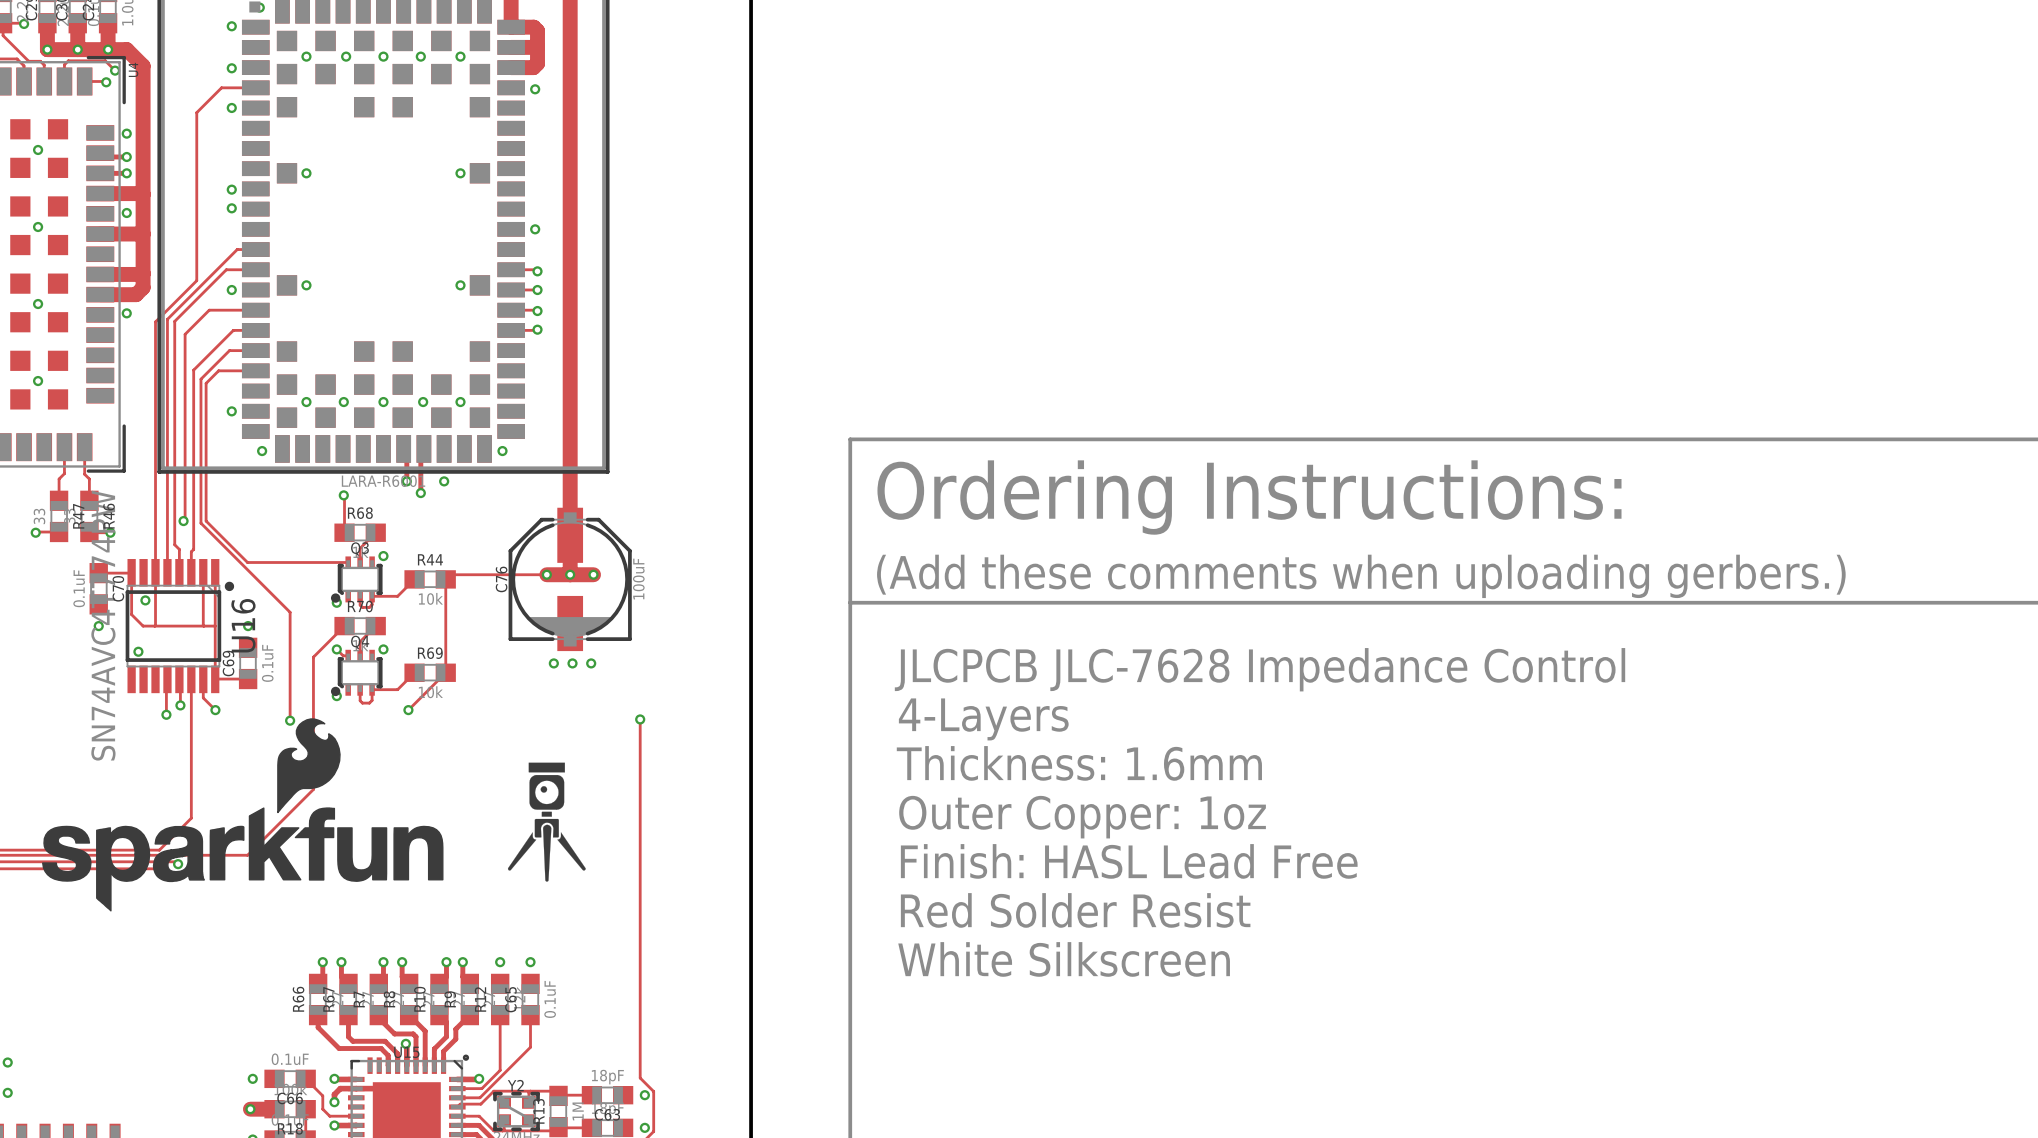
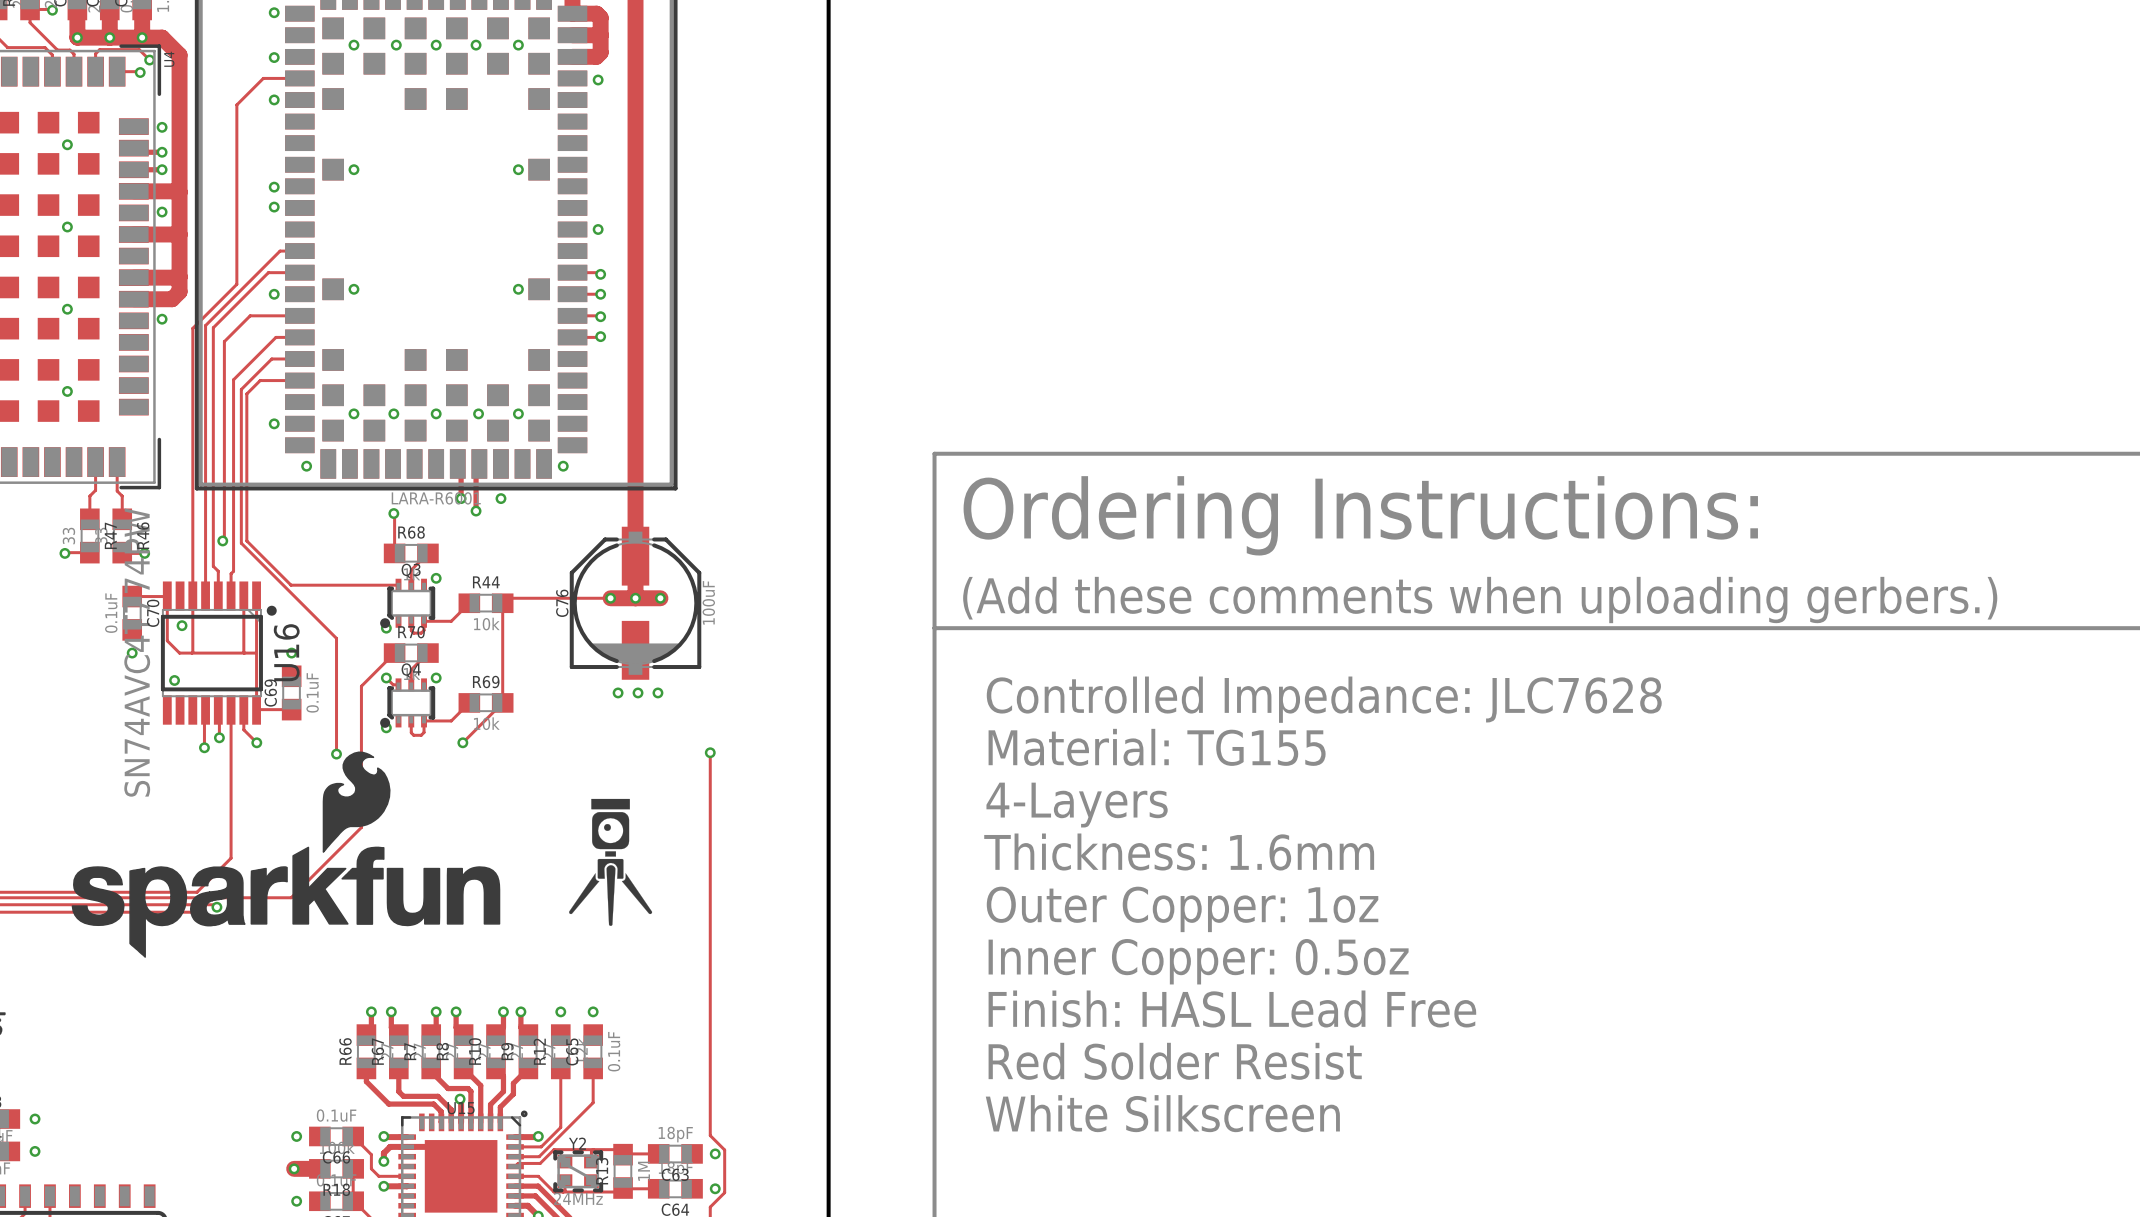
text: JLCPCB JLC-7628 Impedance Control (1260, 669) -> Controlled Impedance: JLC7628 (1324, 699)
text: 4-Layers (983, 719) -> Material: TG155 (1157, 747)
text: Thickness: 1.6mm (1079, 763) -> 4-Layers (1077, 805)
text: Outer Copper: 1oz (1082, 817) -> Thickness: 1.6mm (1179, 852)
text: Finish: HASL Lead Free (1129, 861) -> Outer Copper: 1oz (1182, 909)
text: Red Solder Resist (1075, 910) -> Inner Copper: 0.5oz (1198, 961)
text: White Silkscreen (1064, 959) -> Finish: HASL Lead Free (1232, 1008)
text: none -> Red Solder Resist (1175, 1061)
text: none -> White Silkscreen (1162, 1113)

